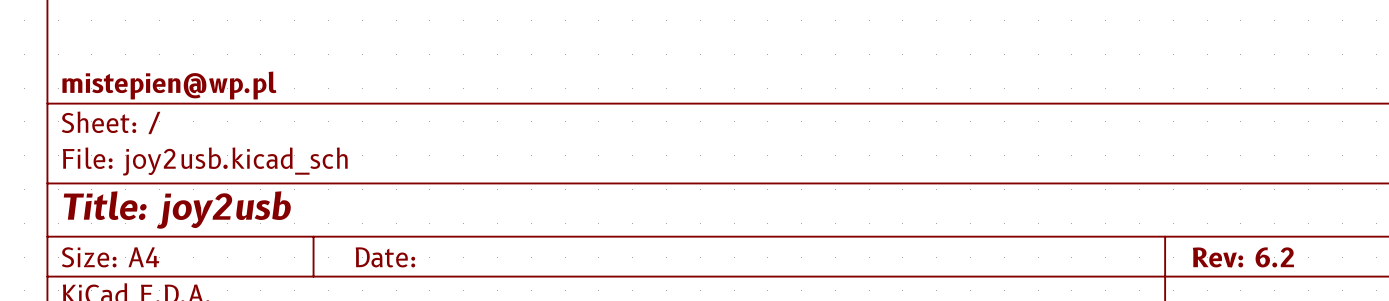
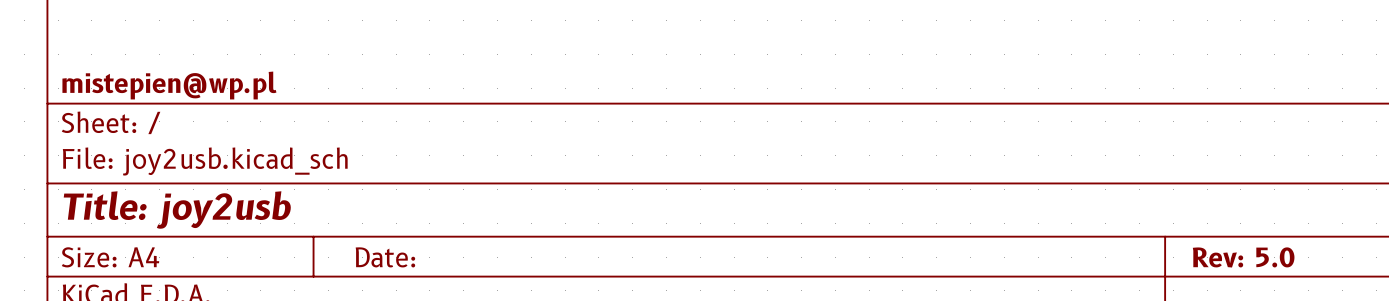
title block: Rev: 6.2 (1243, 257) -> Rev: 5.0 (1243, 257)

